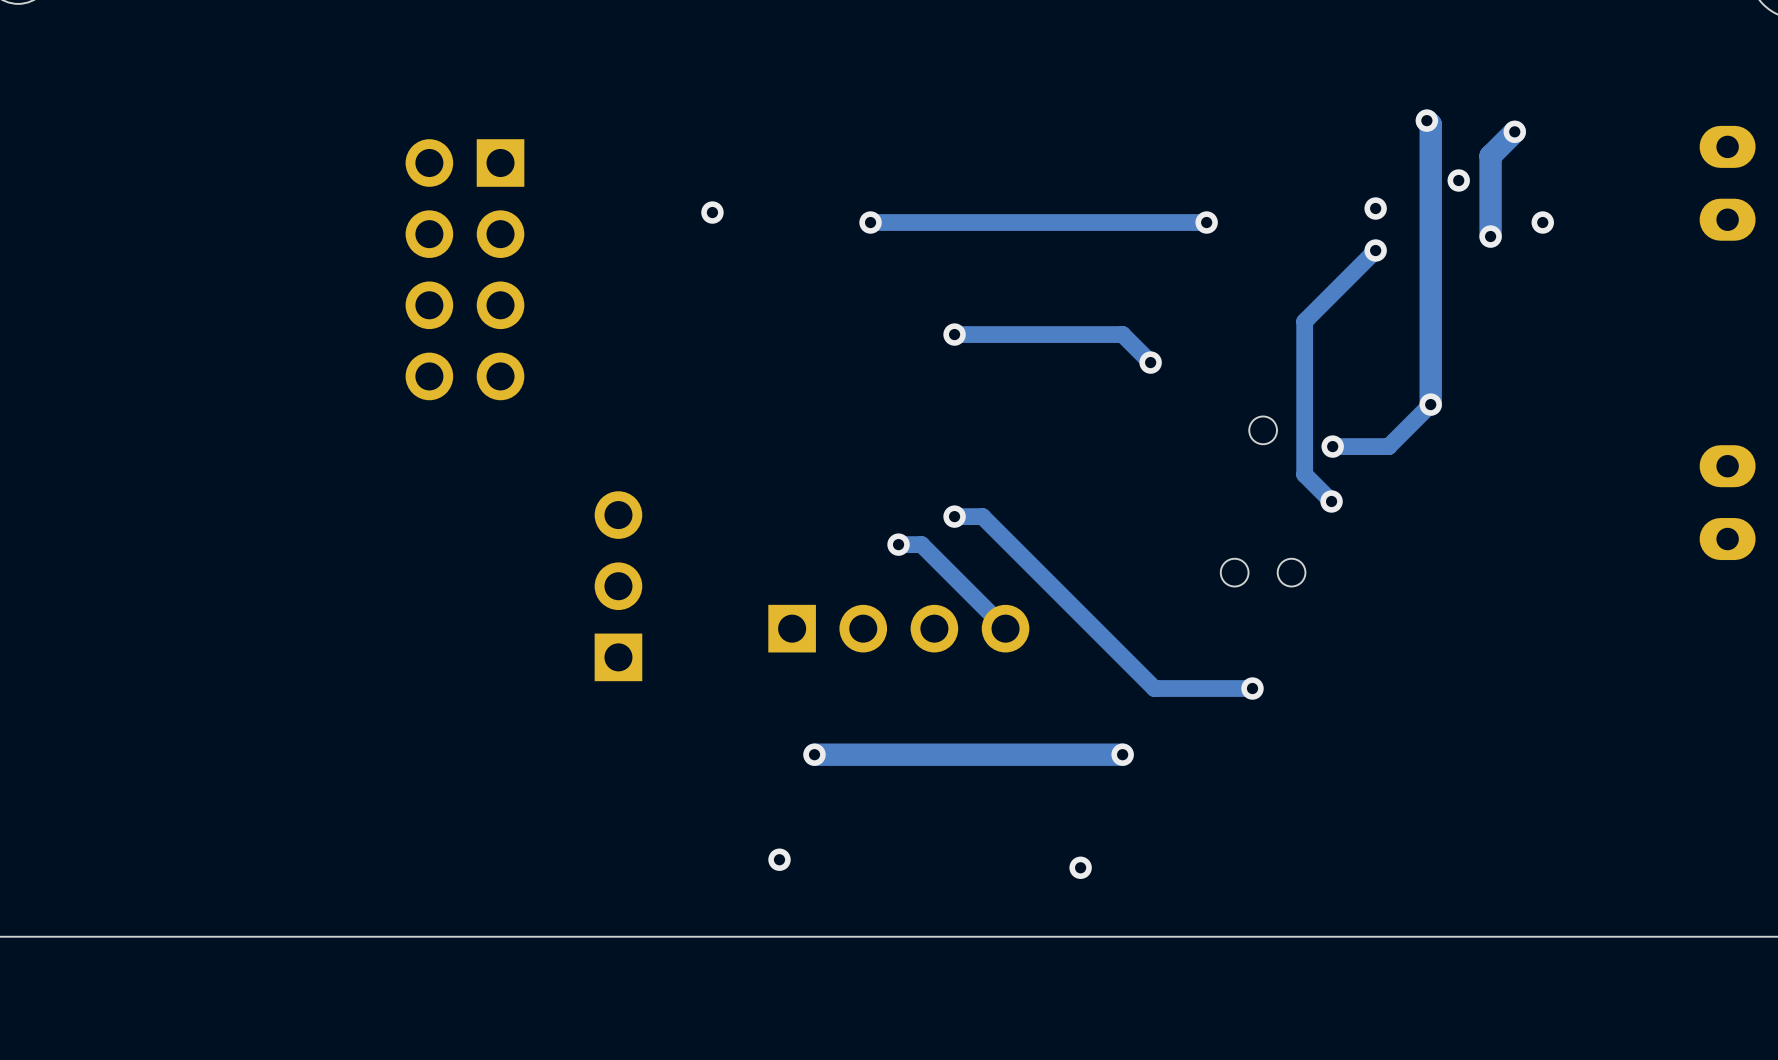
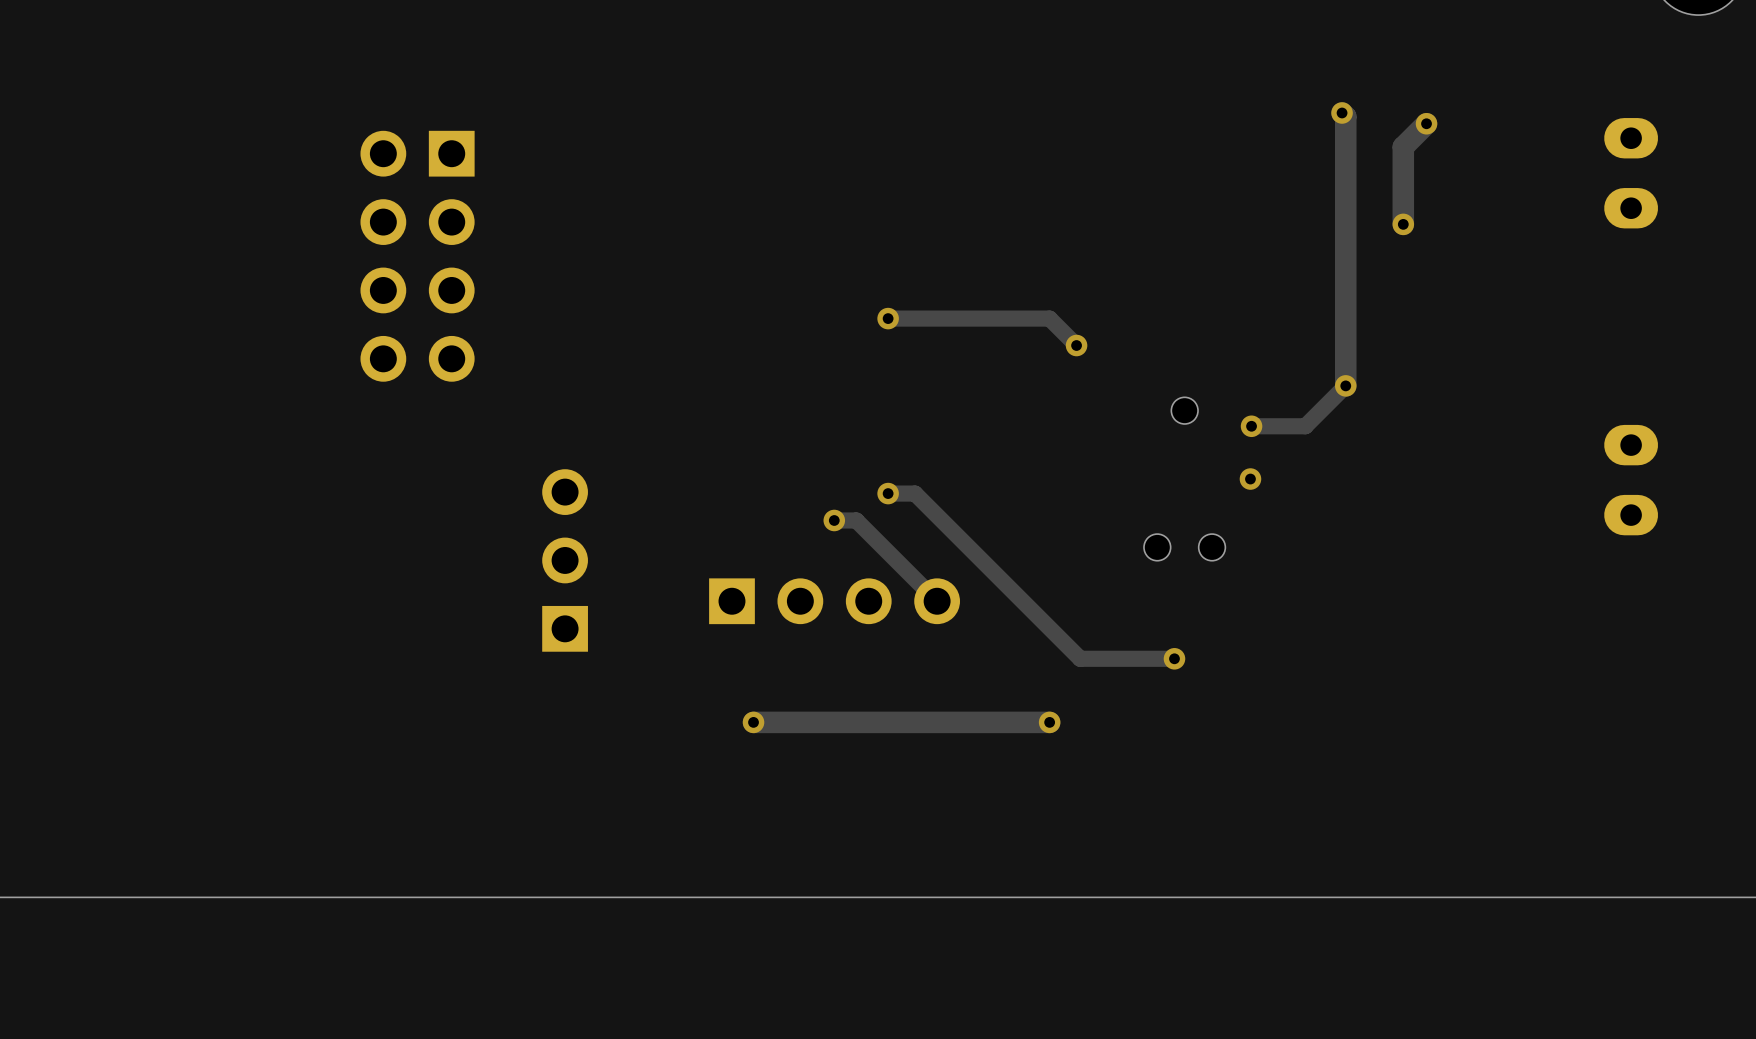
via: (1458, 180) -> none
via: (1375, 208) -> none
via: (712, 212) -> none
via: (870, 222) -> none
track: (1206, 222) (870, 222) -> none
via: (1206, 222) -> none
via: (1542, 222) -> none
track: (1375, 250) (1304, 321) (1304, 474) (1331, 501) -> none
via: (1375, 250) -> none
via: (779, 859) -> none
via: (1080, 867) -> none

